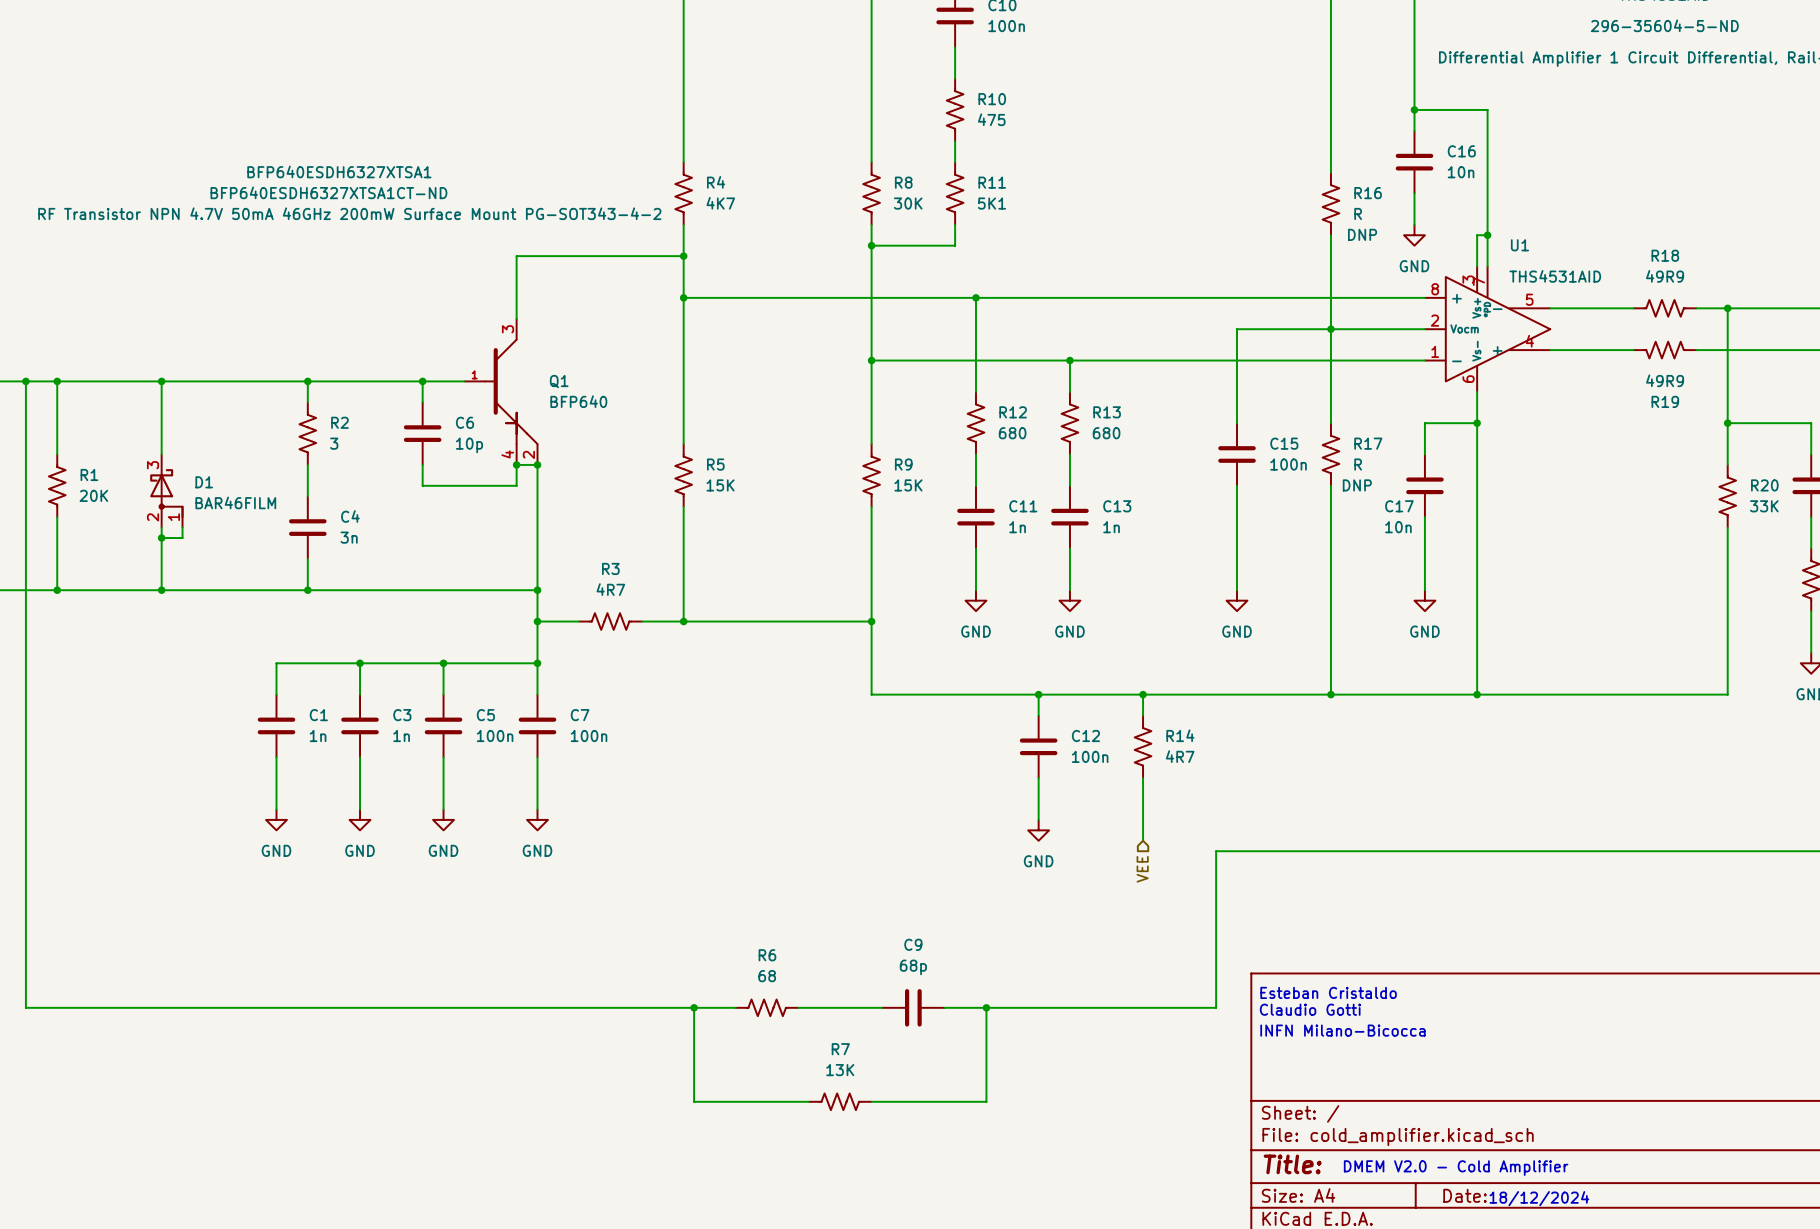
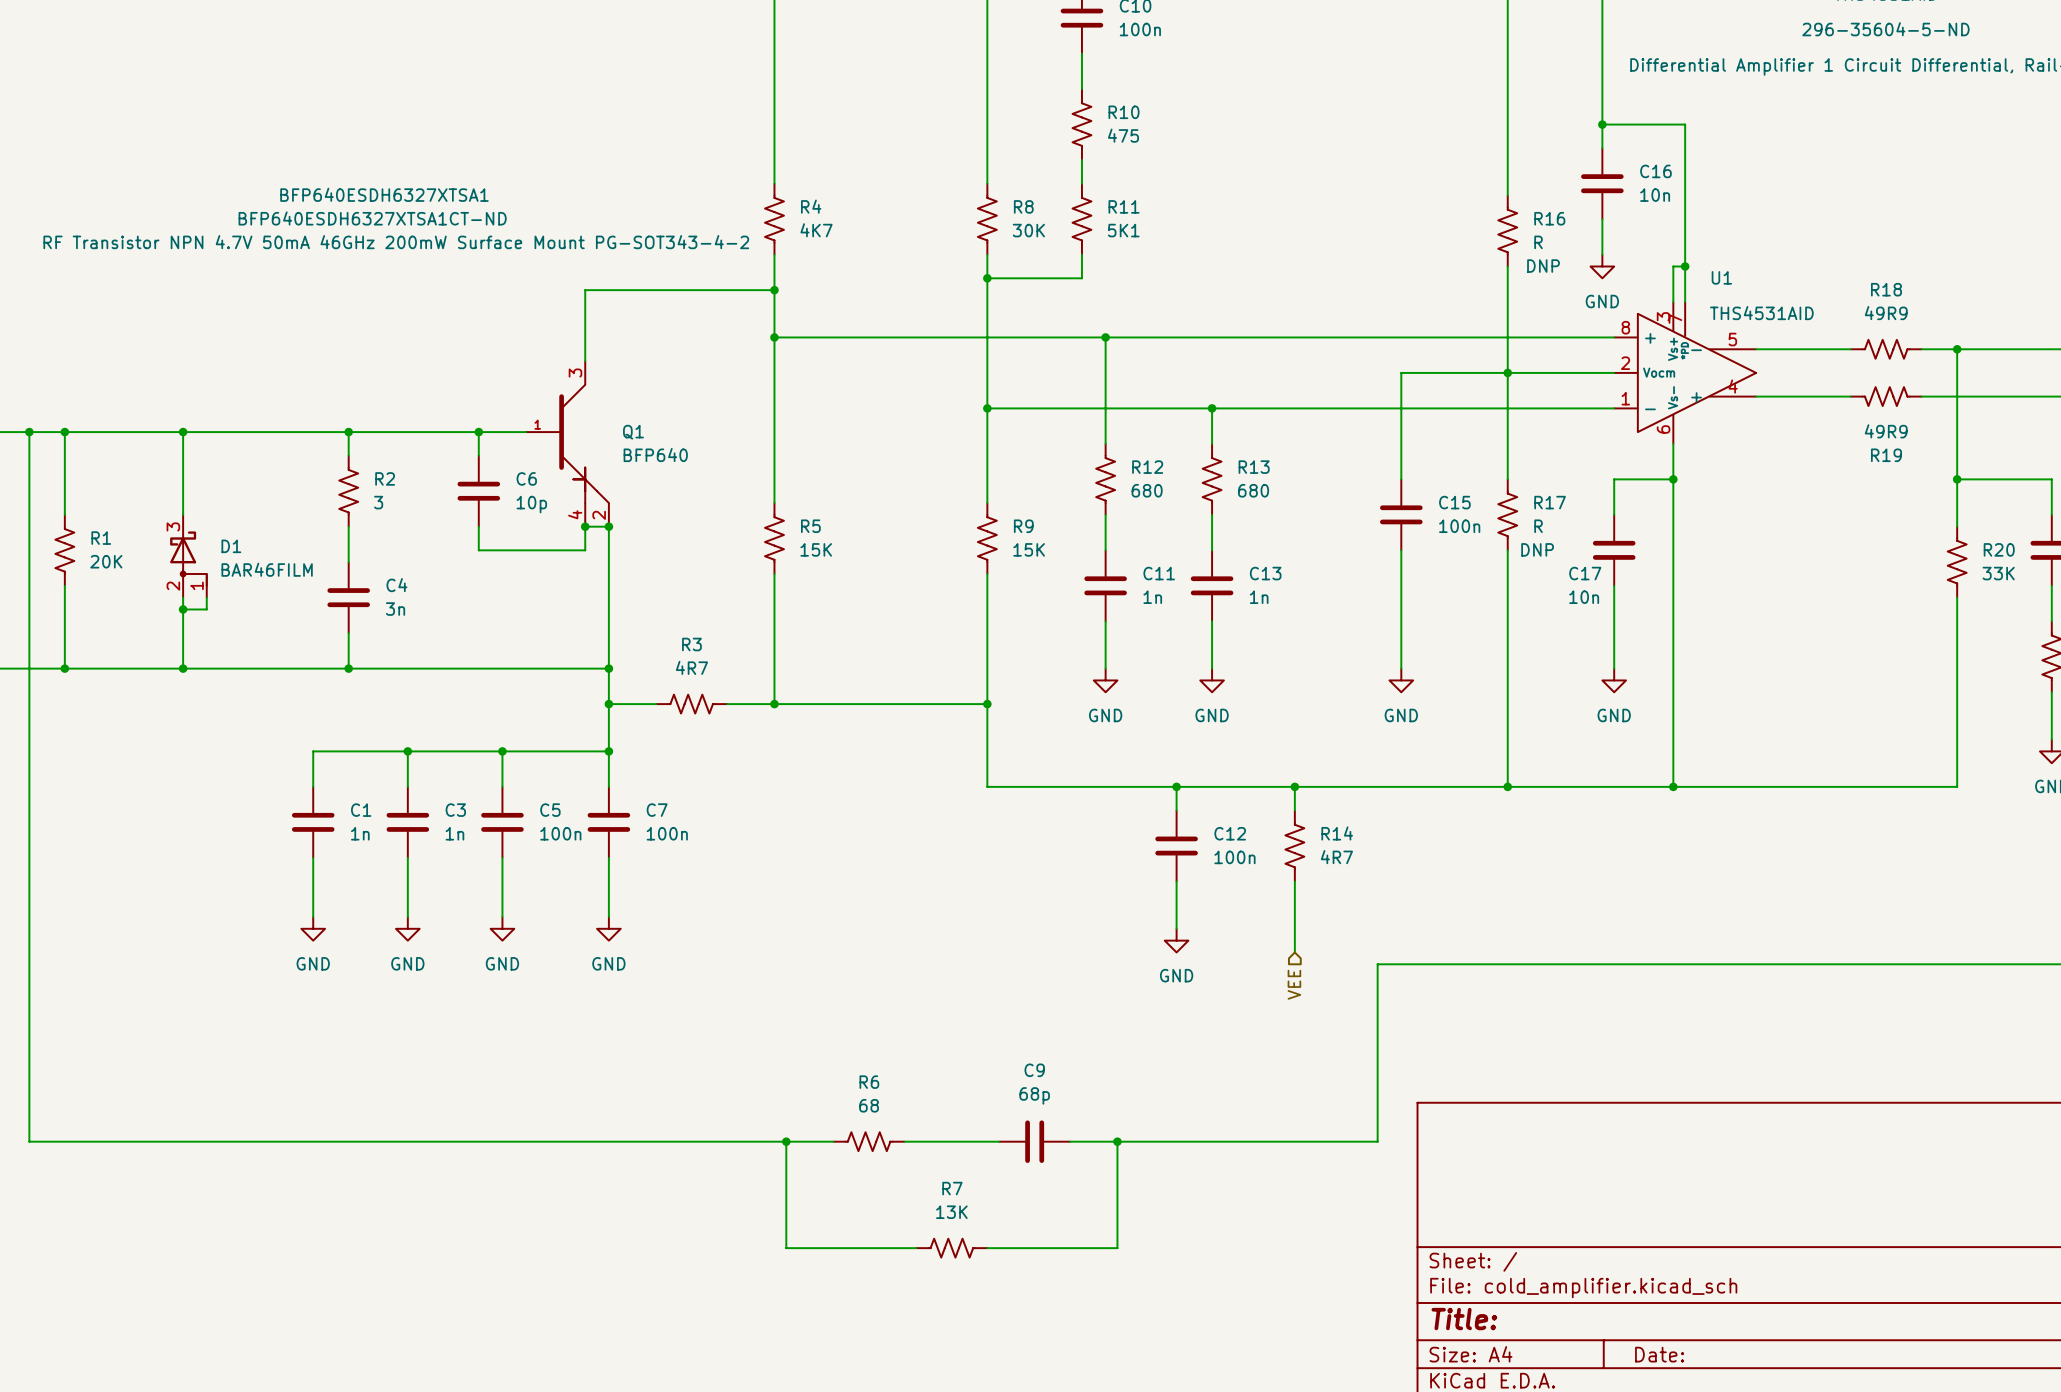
text: Esteban Cristaldo (1328, 992) -> none
text: Claudio Gotti (1310, 1009) -> none
text: INFN Milano-Bicocca (1342, 1030) -> none
text: DMEM V2.0 - Cold Amplifier (1456, 1168) -> none
text: 18/12/2024 (1539, 1198) -> none

